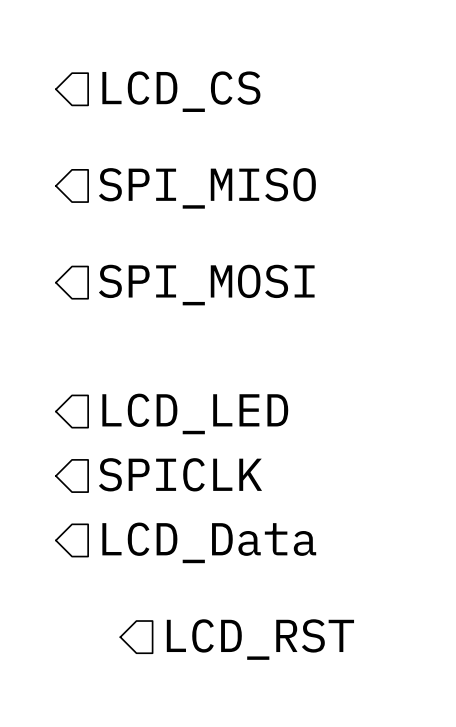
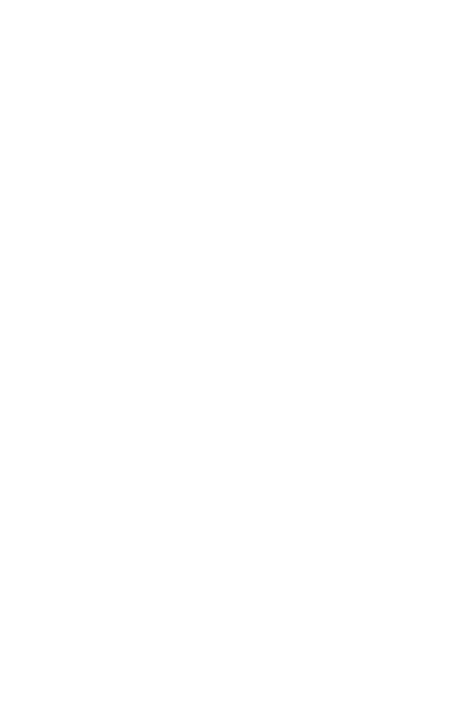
hierarchical label: LCD_CS (181, 91) -> none
hierarchical label: SPI_MISO (207, 188) -> none
hierarchical label: SPI_MOSI (206, 285) -> none
hierarchical label: LCD_LED (195, 413) -> none
hierarchical label: SPICLK (180, 474) -> none
hierarchical label: LCD_Data (209, 542) -> none
hierarchical label: LCD_RST (260, 639) -> none

